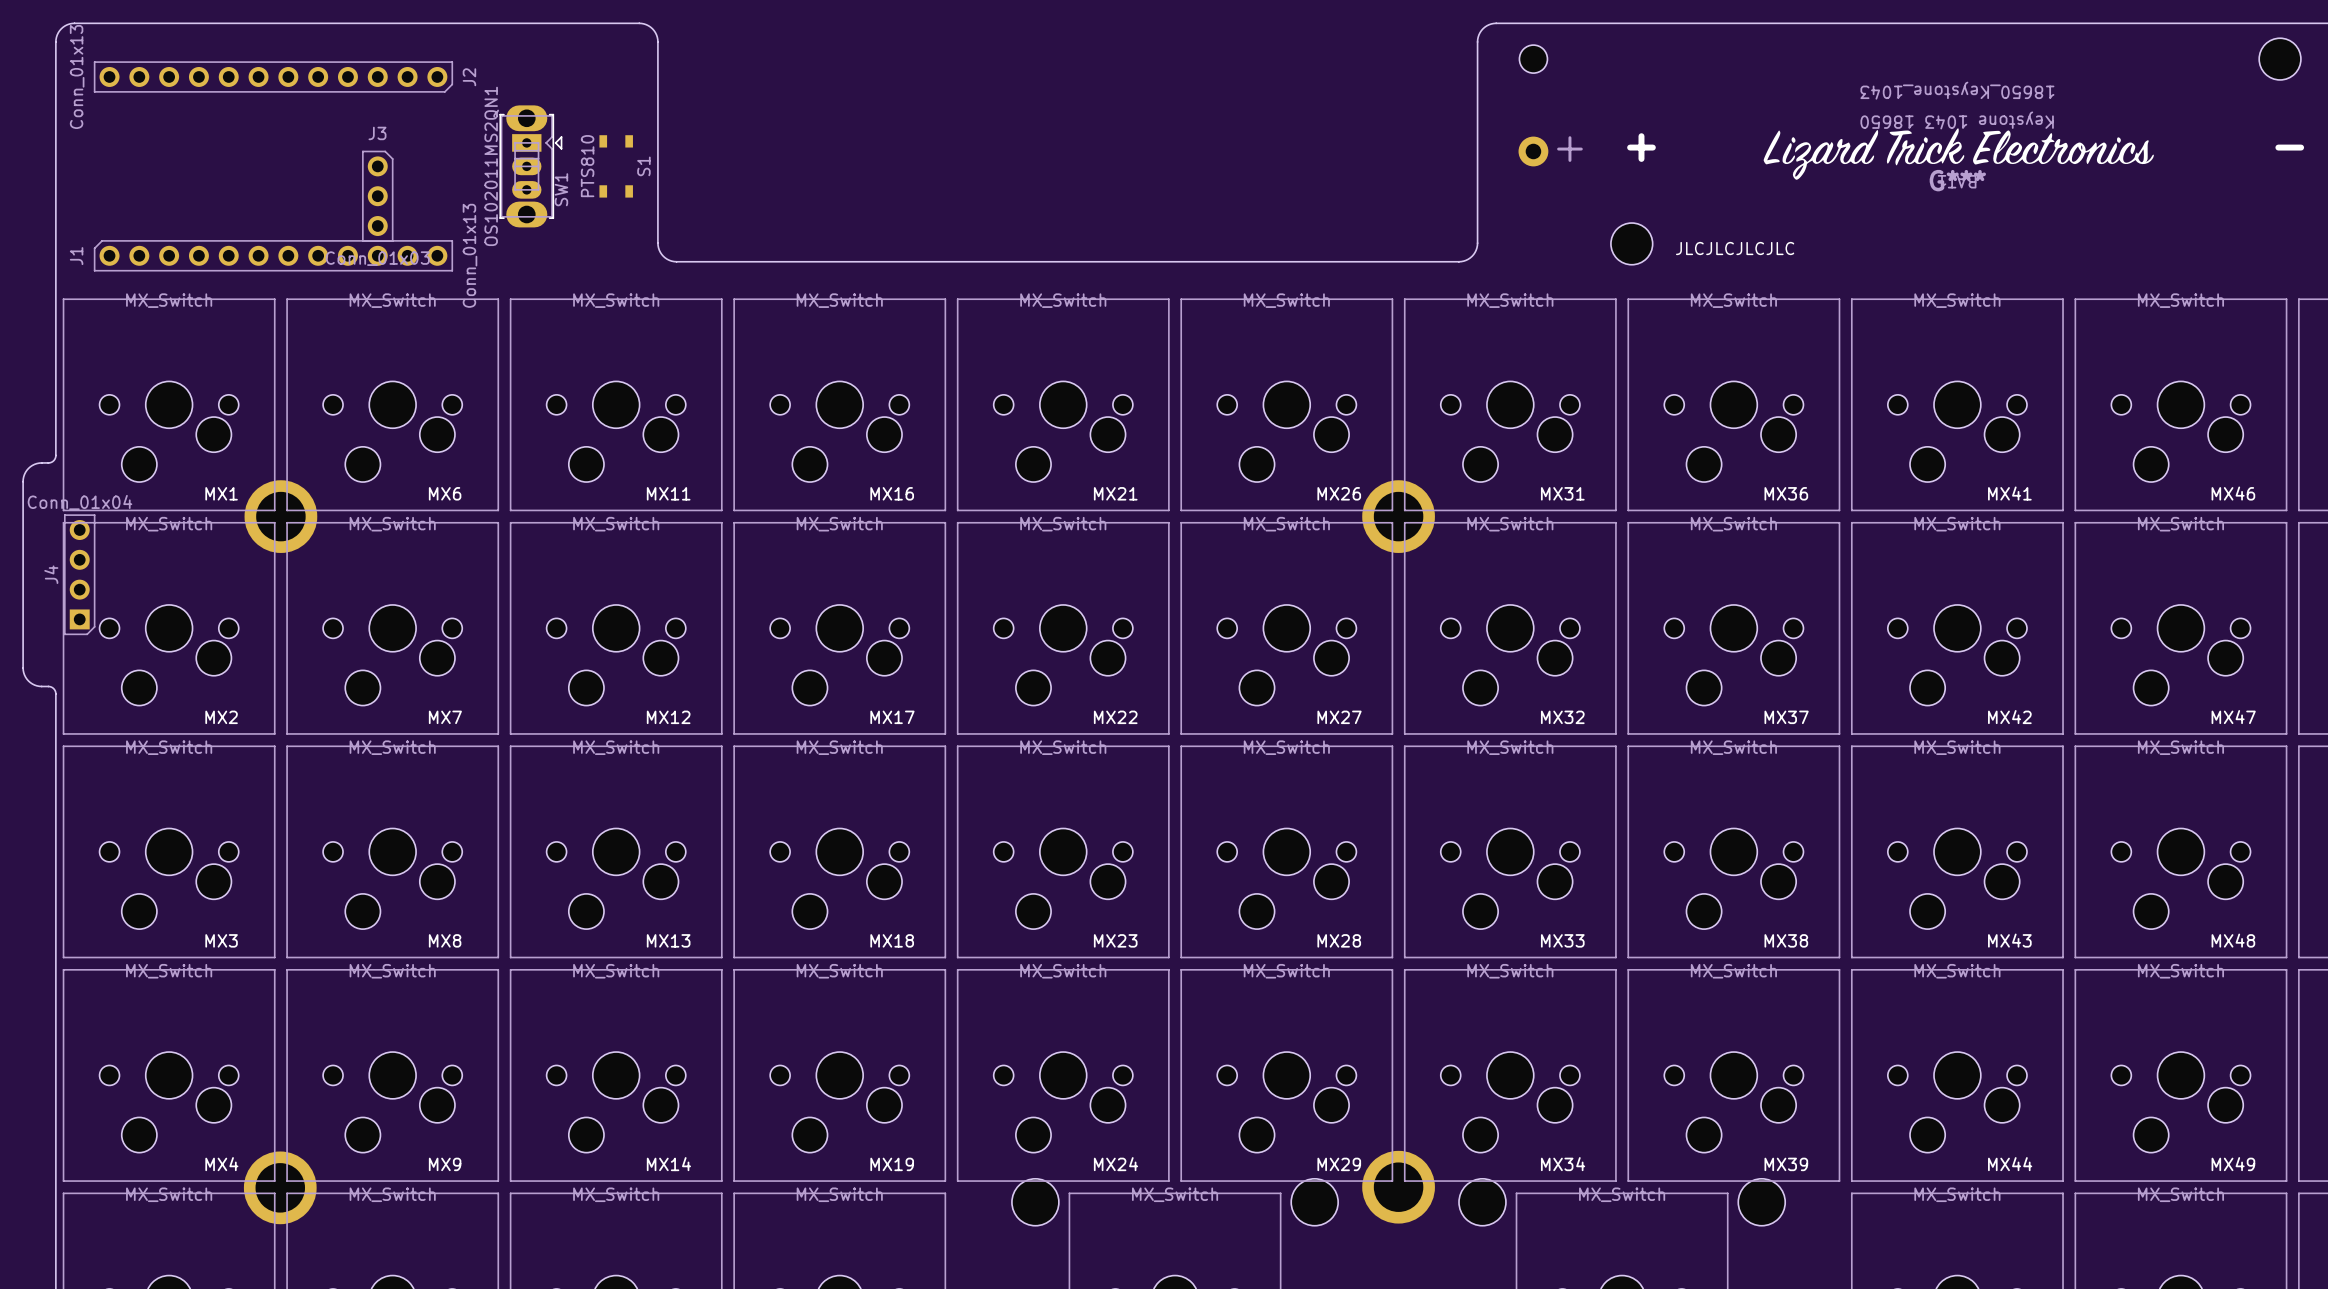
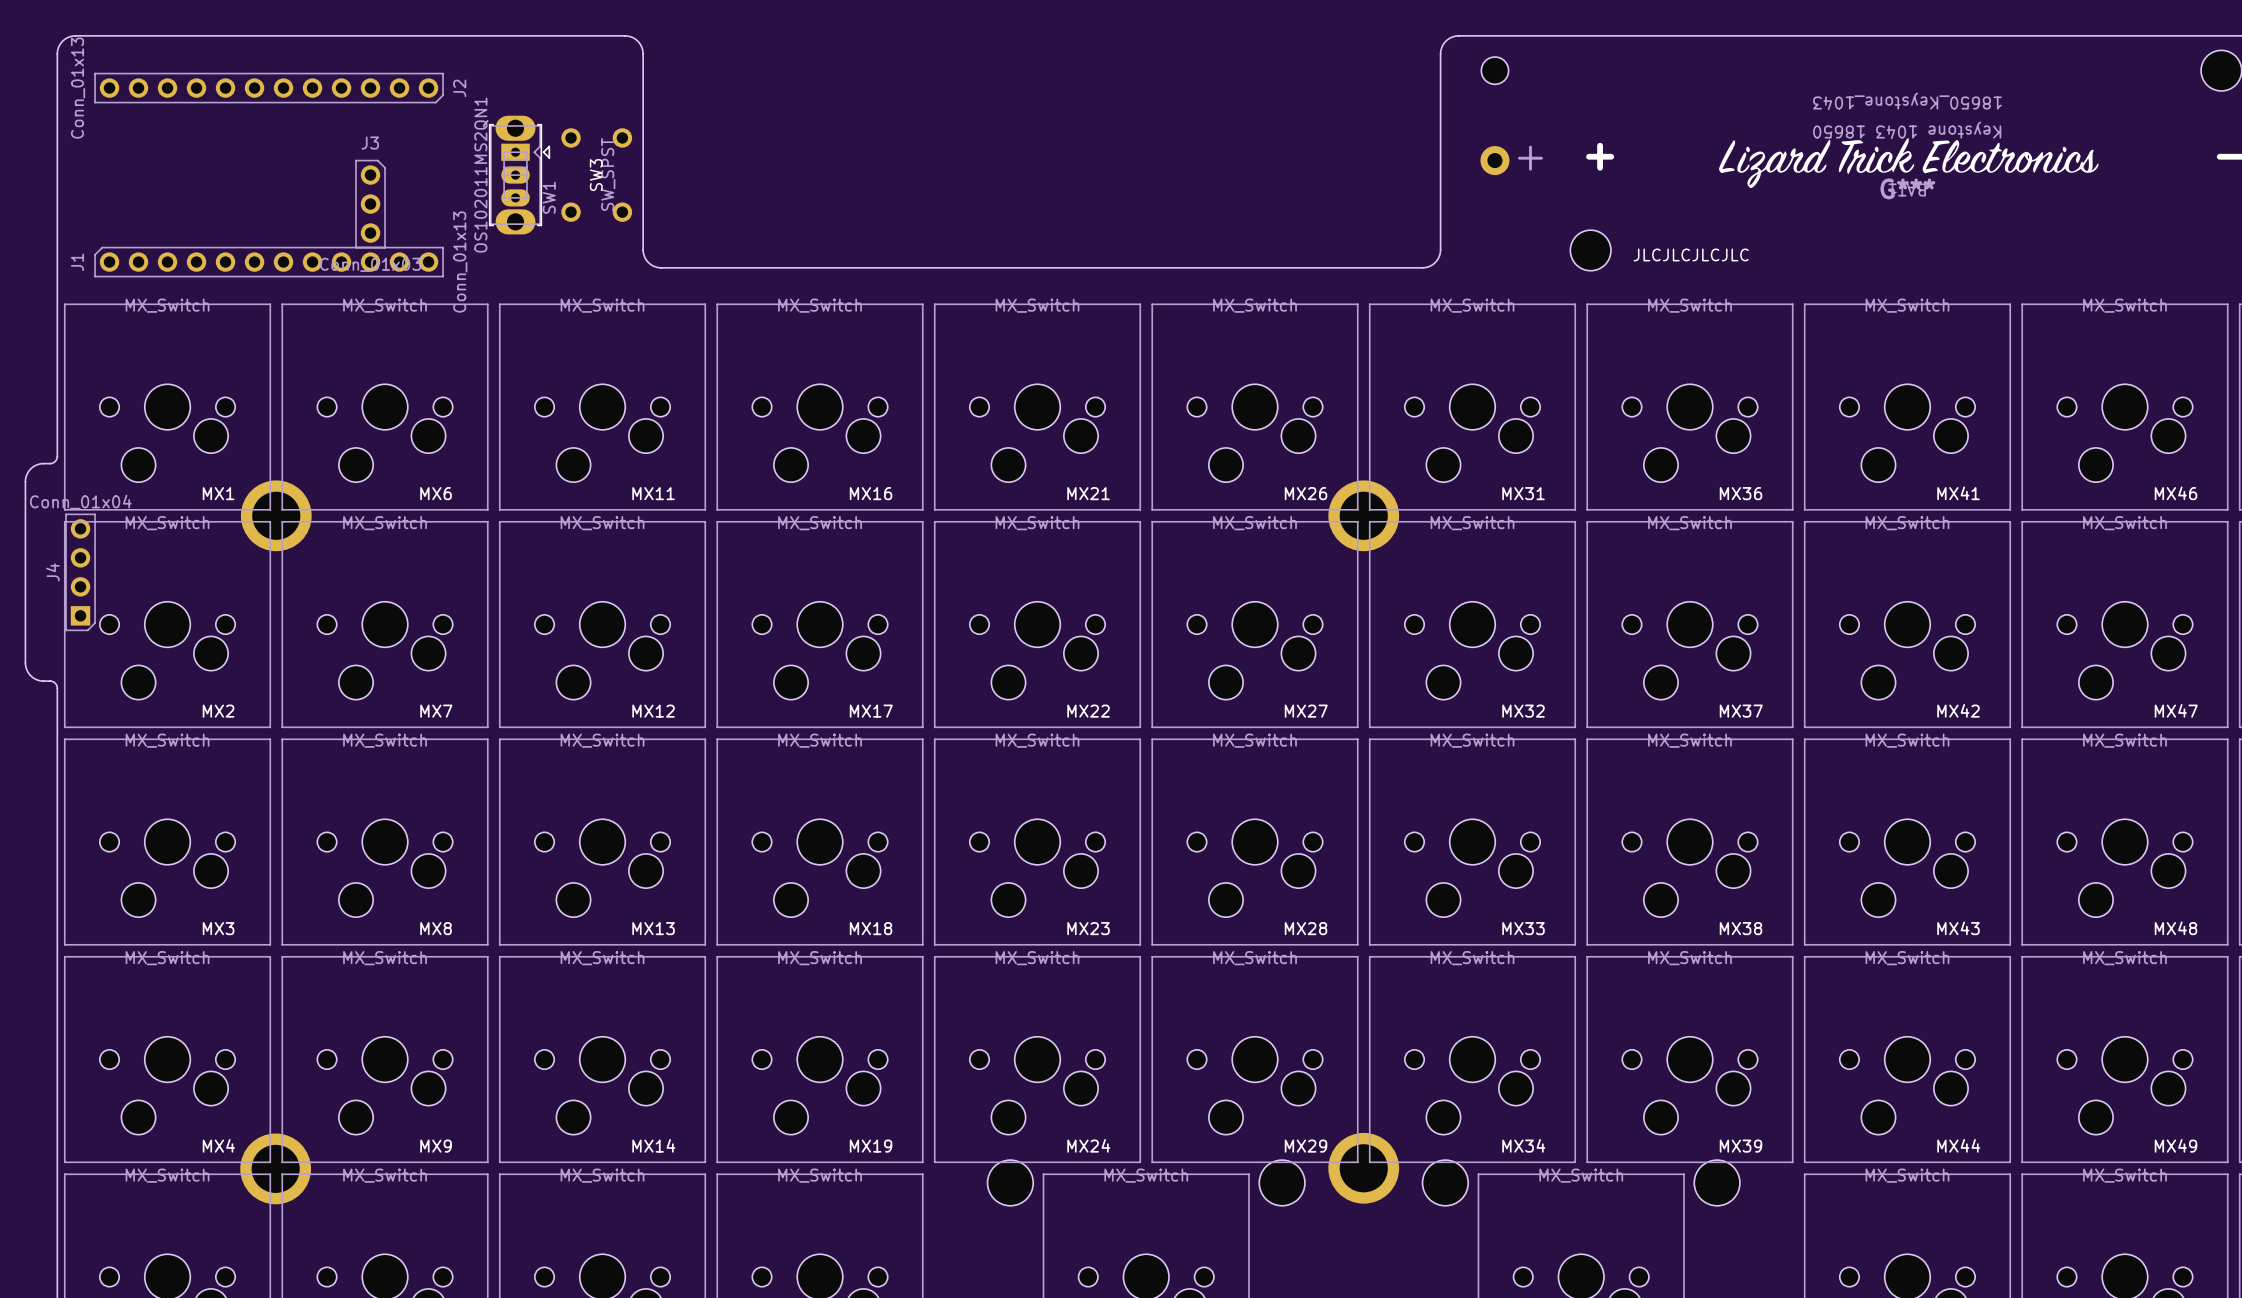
SW3: none -> SW_SPST (596, 175)
S1: PTS810 (616, 166) -> none

